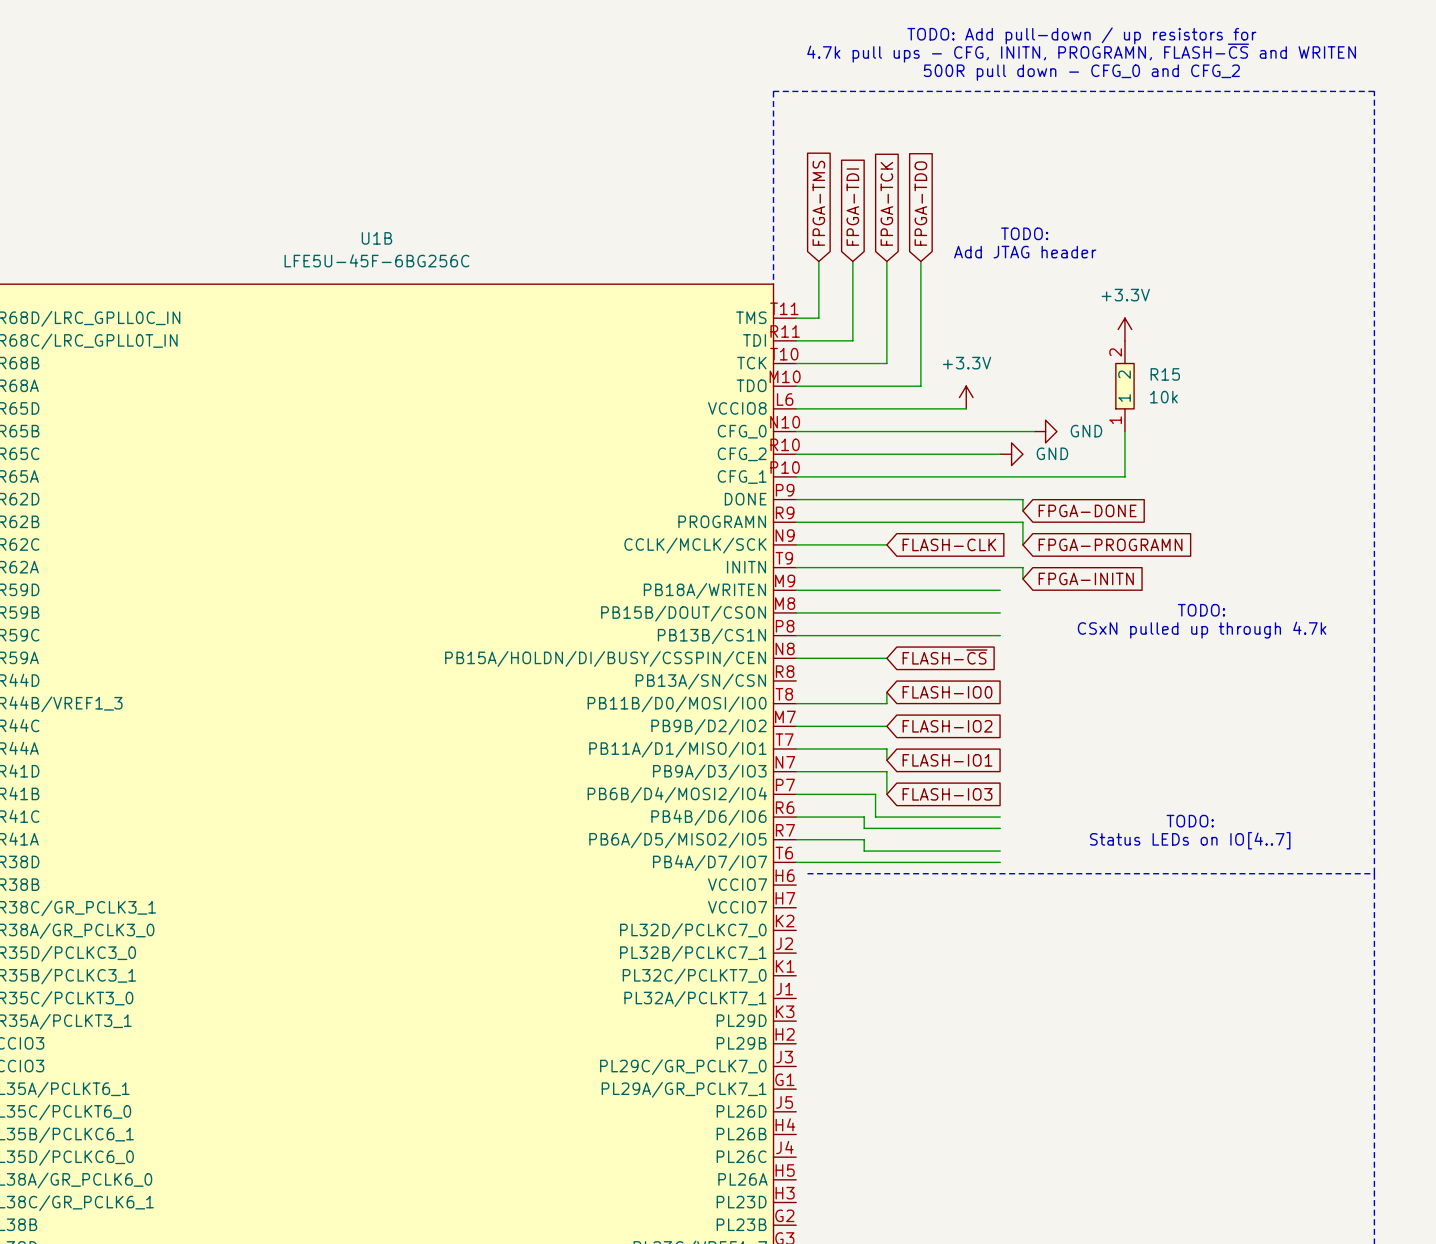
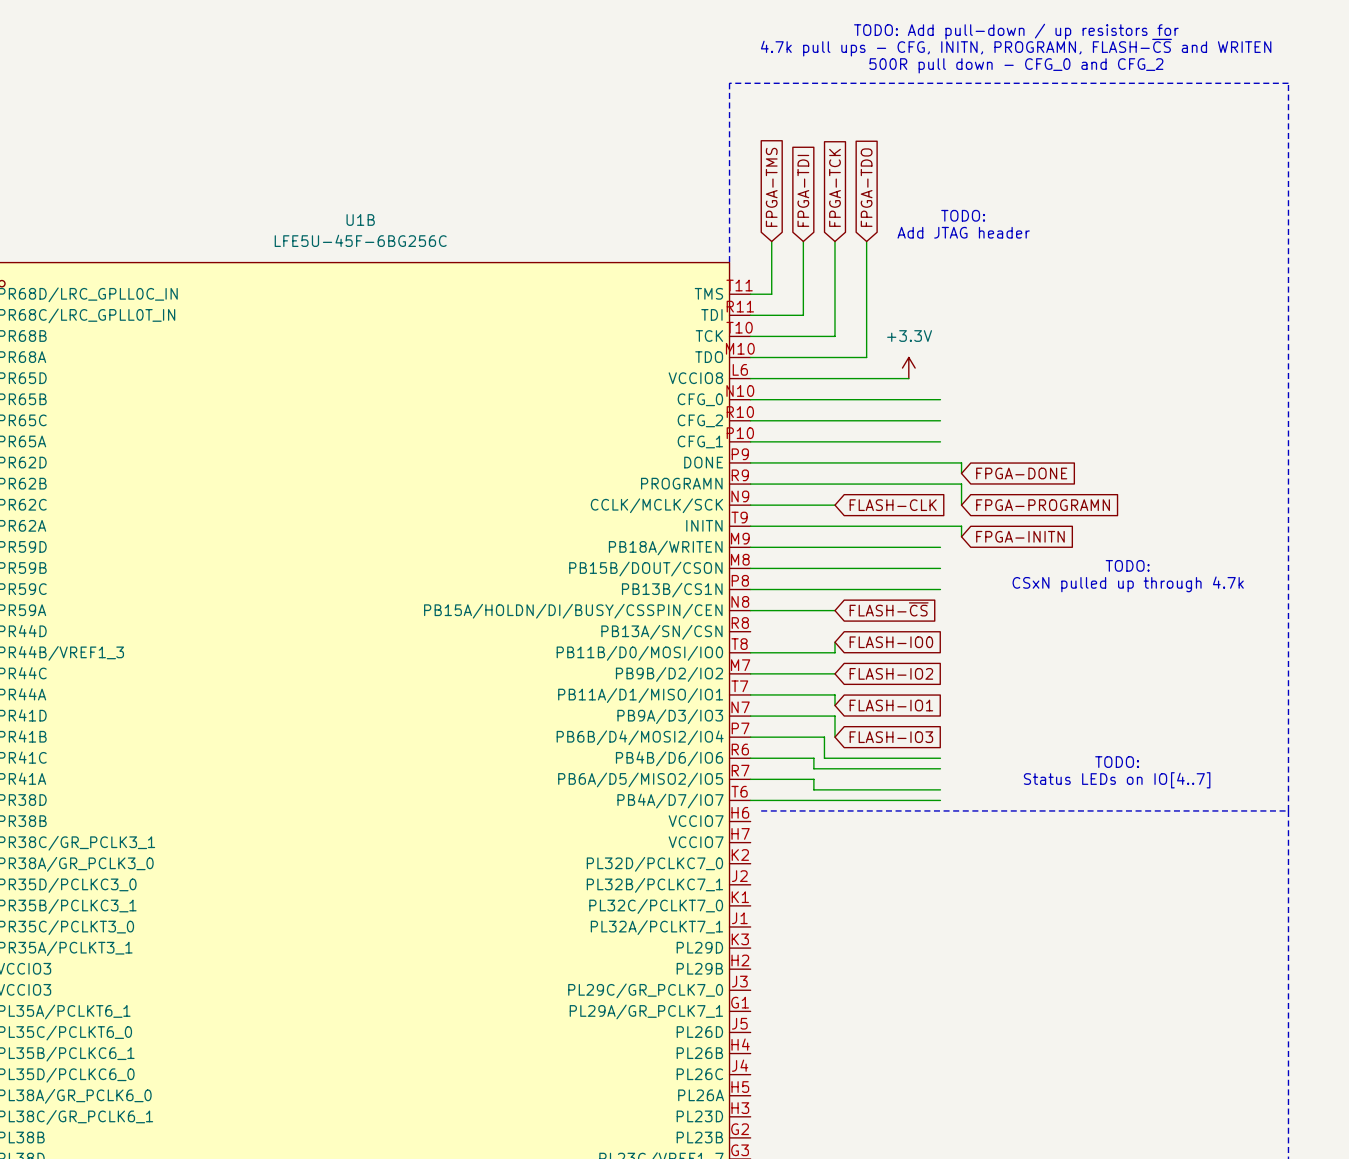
power symbol: +3.3V (1124, 329) -> none
R15: 10k (1124, 386) -> none
wire: (1000, 431) (1034, 431) -> none
power symbol: GND (1045, 431) -> none
wire: (1124, 431) (1124, 476) (1000, 476) -> none
power symbol: GND (1011, 454) -> none

